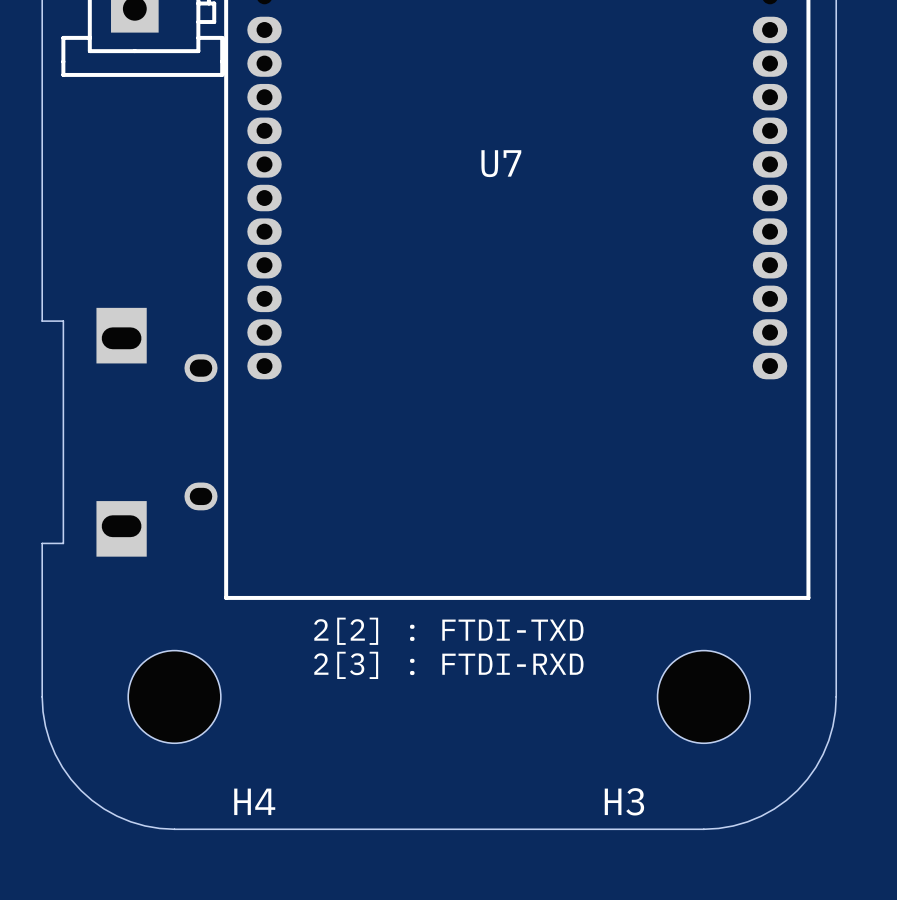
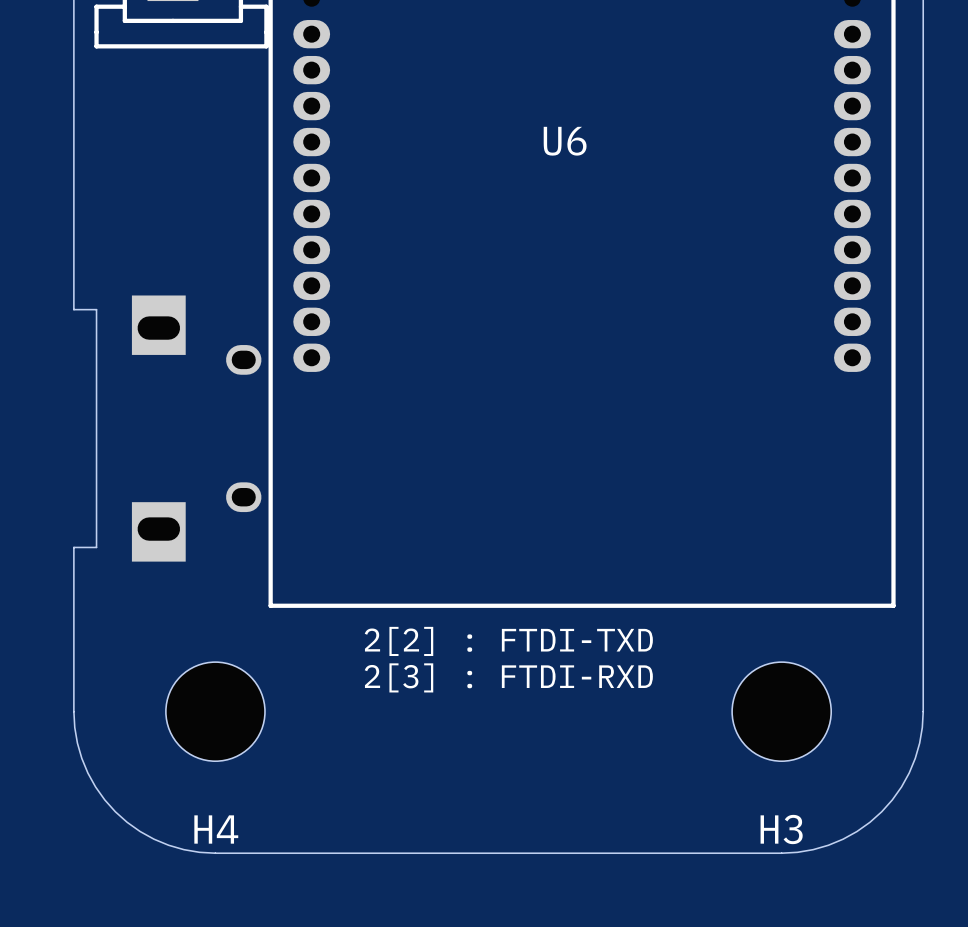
U7 name: U7 (501, 163) -> U6 (565, 141)
H4 name position: H4 (254, 801) -> H4 (216, 829)
H3 name position: H3 (624, 801) -> H3 (781, 829)

